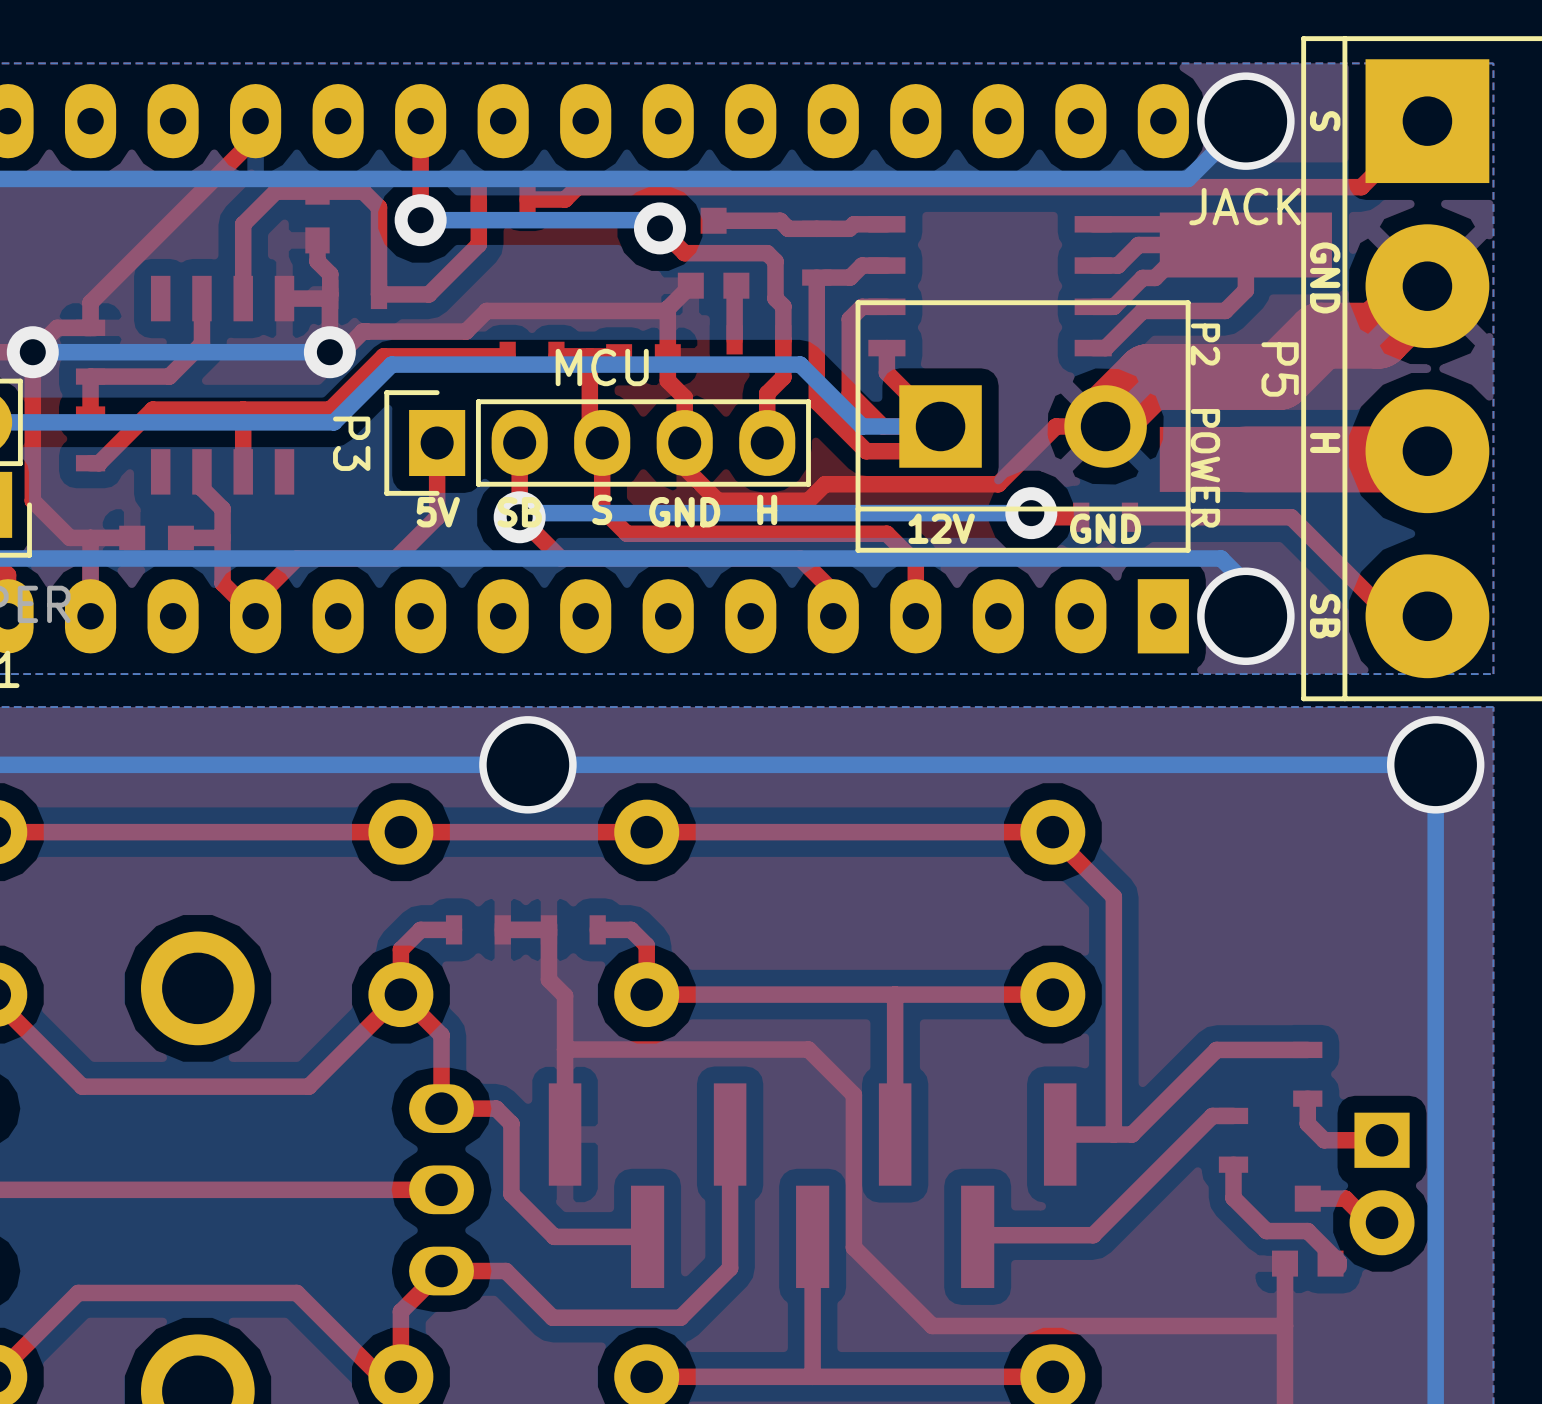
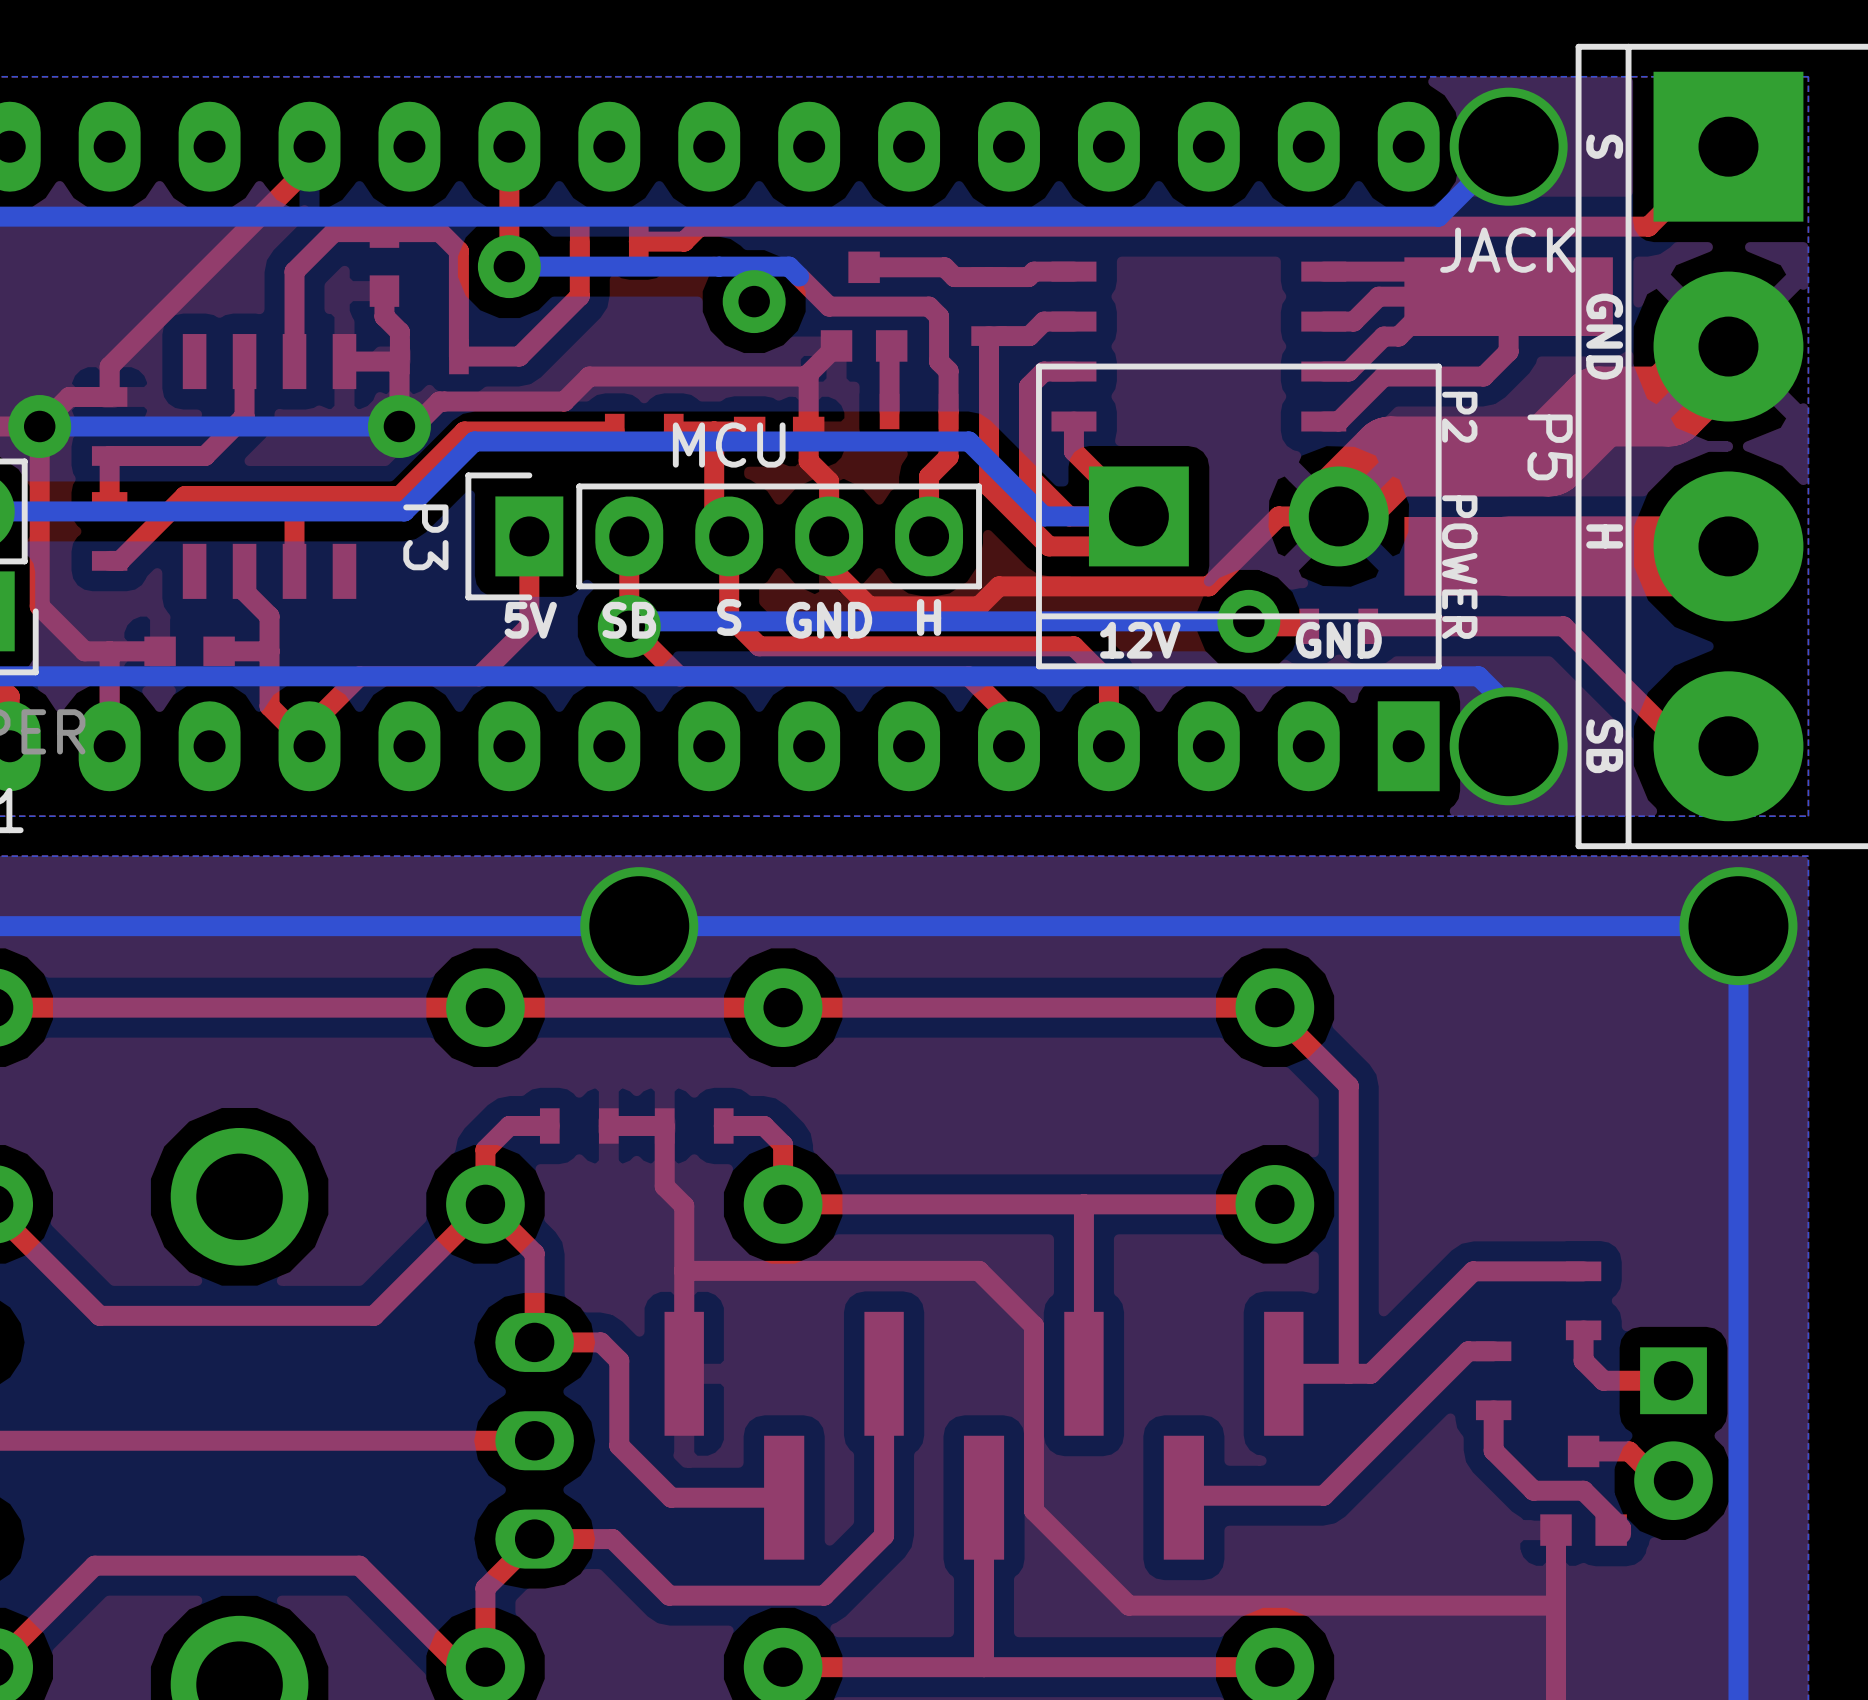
via position: (659, 228) -> (754, 301)

